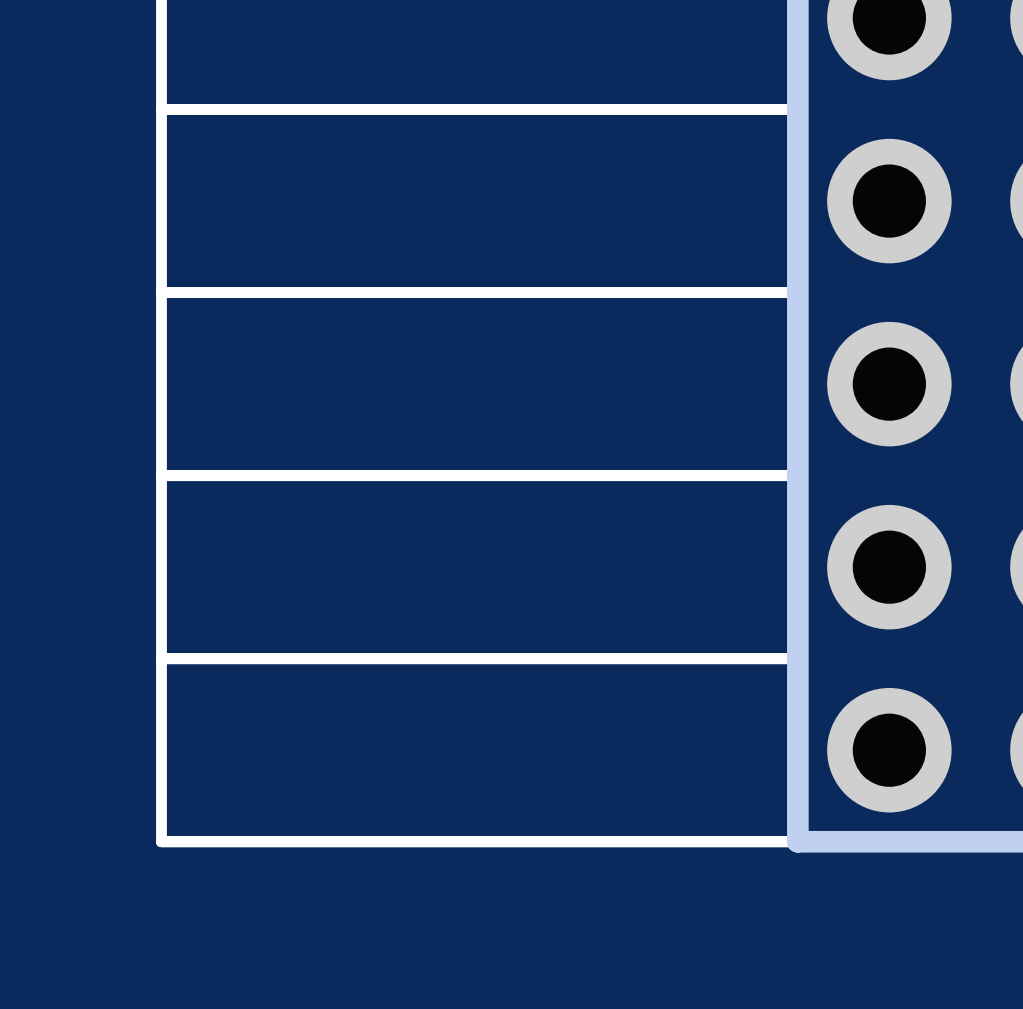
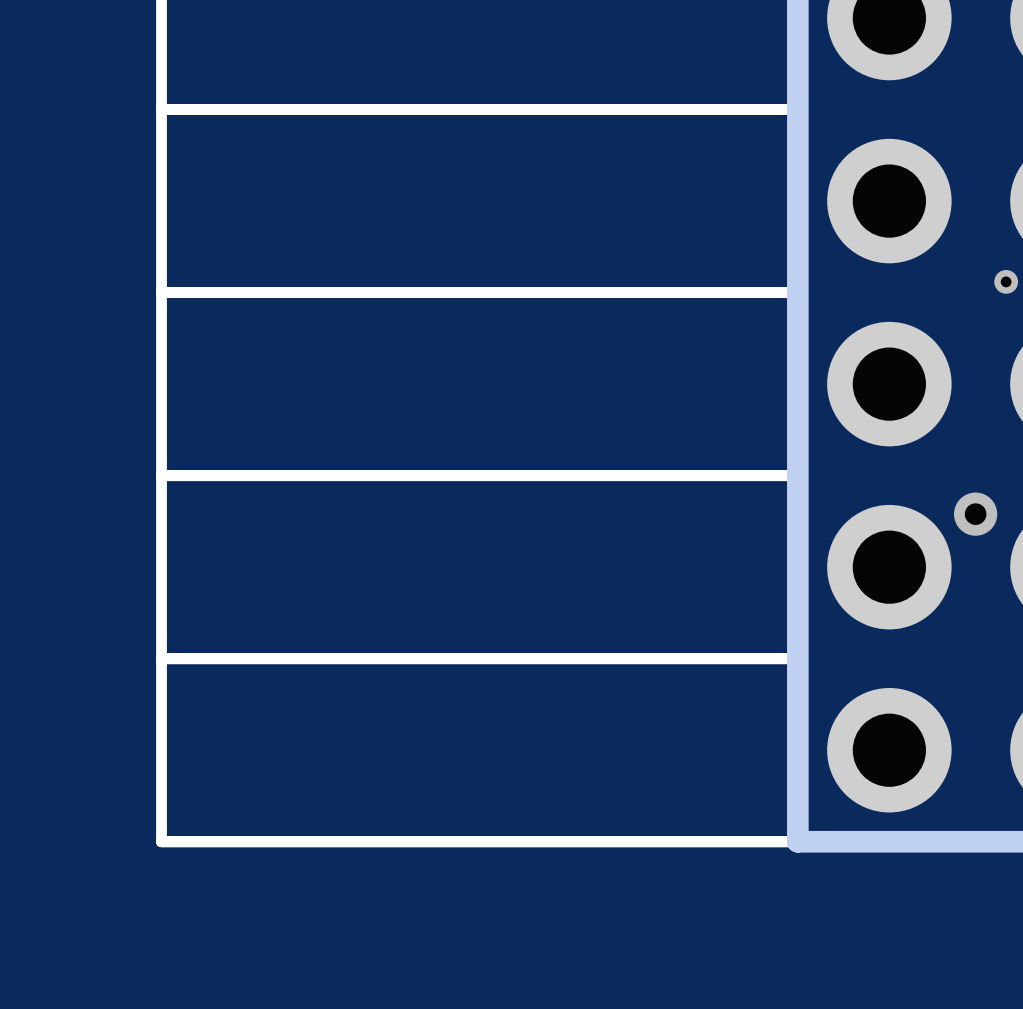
via: none -> (1006, 281)
via: none -> (975, 514)

